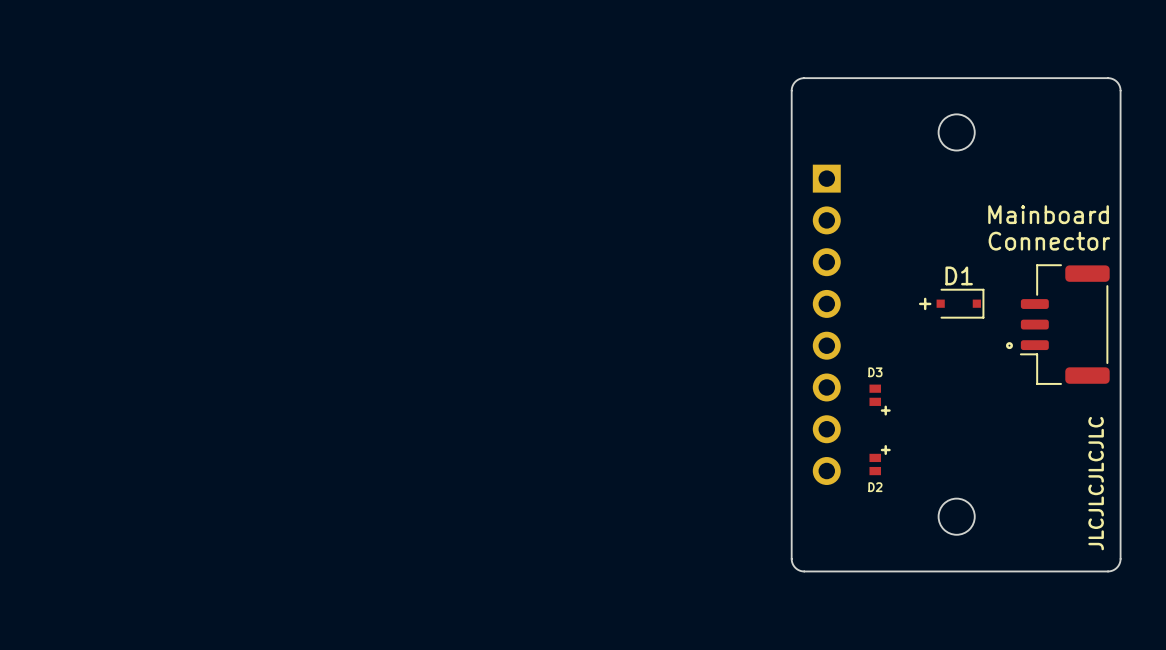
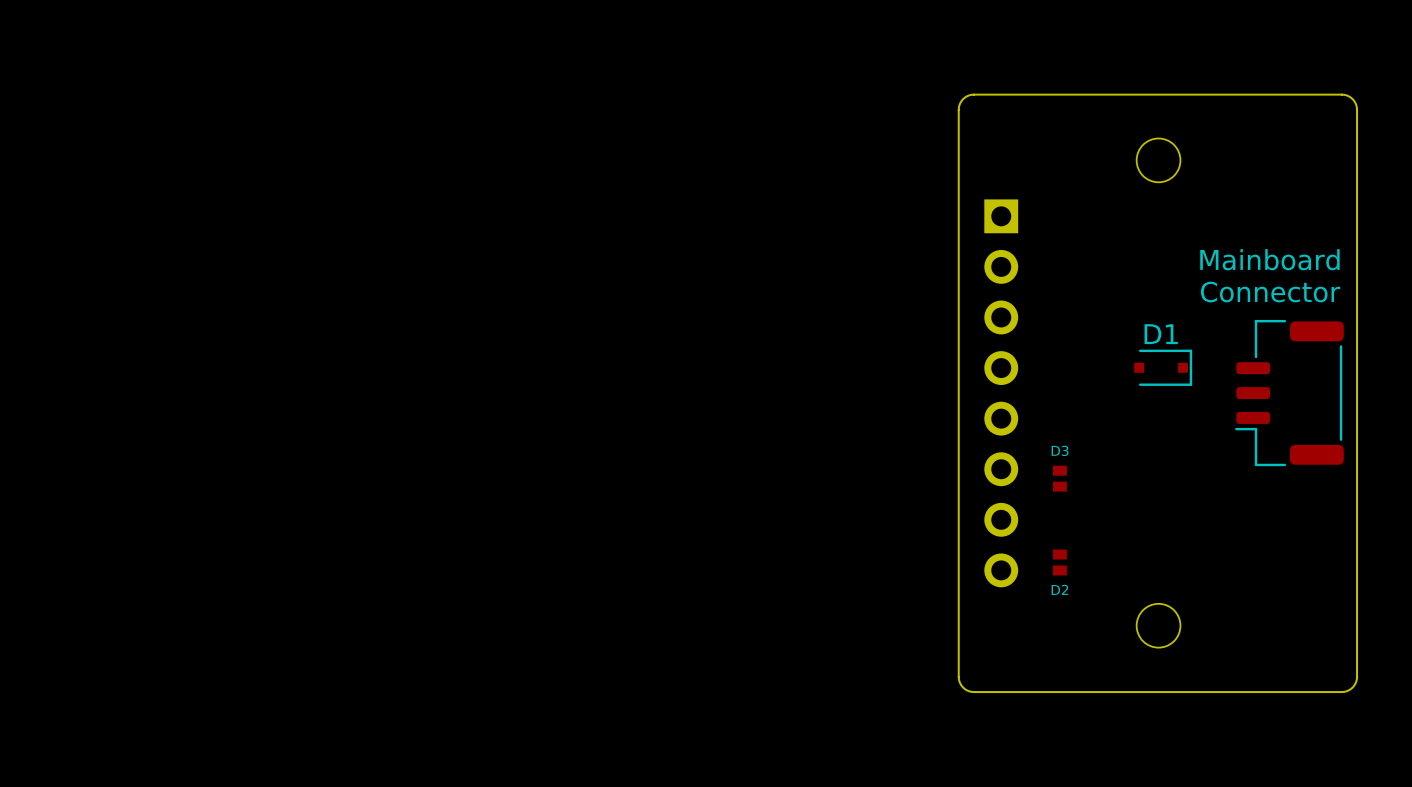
text: + (925, 303) -> none
drawing: [1006, 342, 1013, 350] -> none
text: + (885, 410) -> none
text: + (885, 450) -> none
text: JLCJLCJLCJLC (1096, 483) -> none

